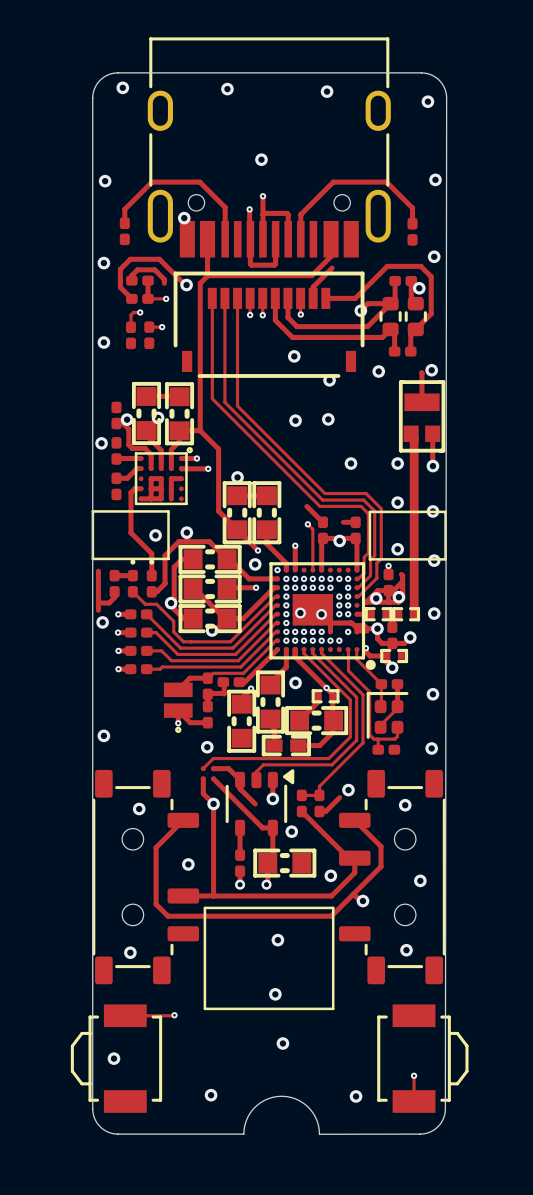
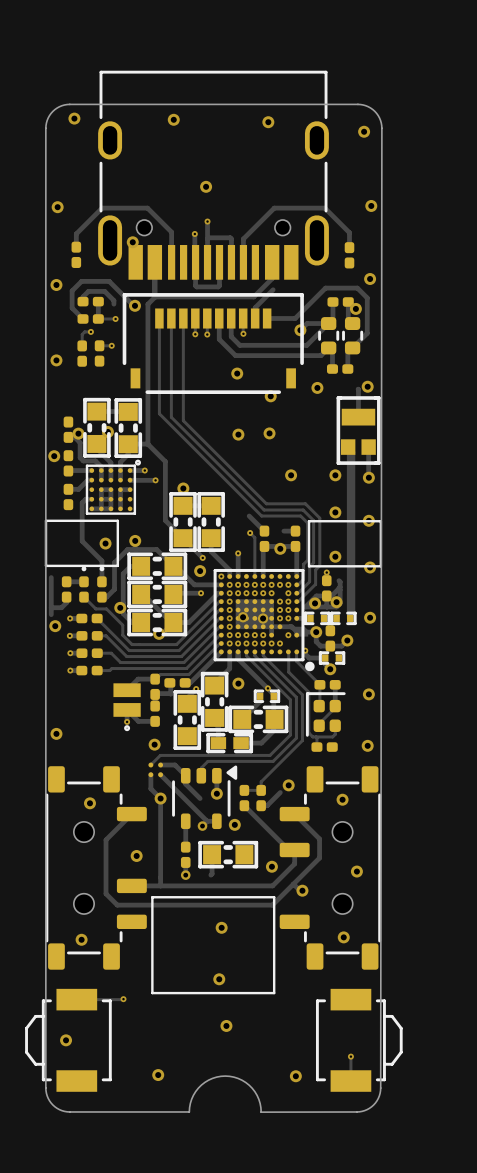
track: (272, 827) (272, 858) -> none
via position: (266, 884) -> (202, 826)

